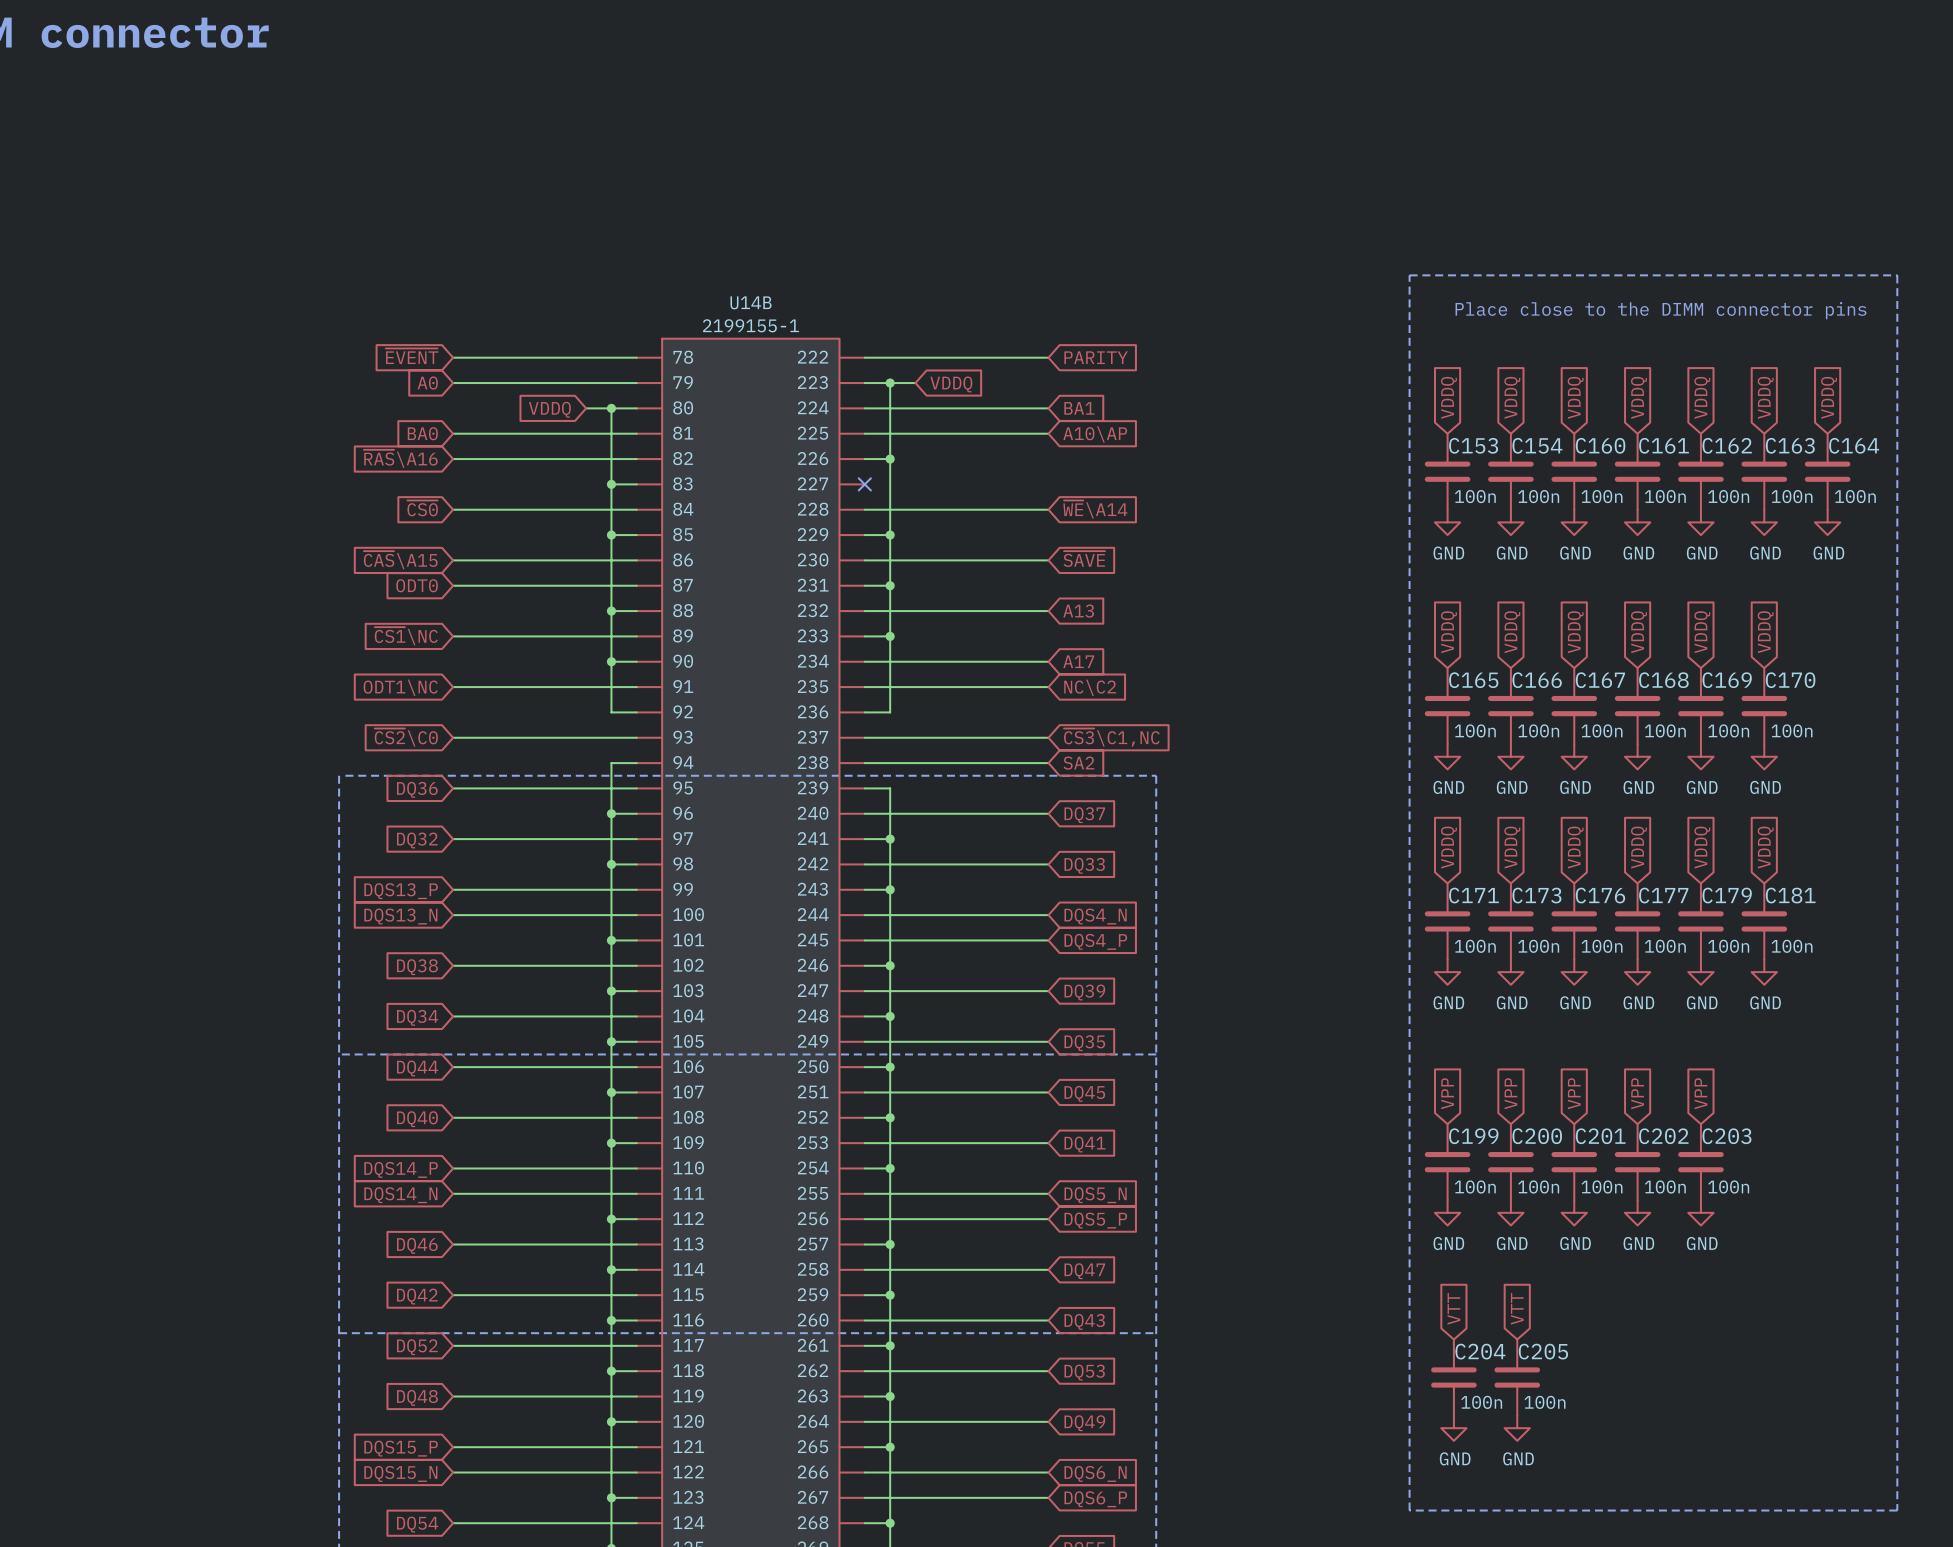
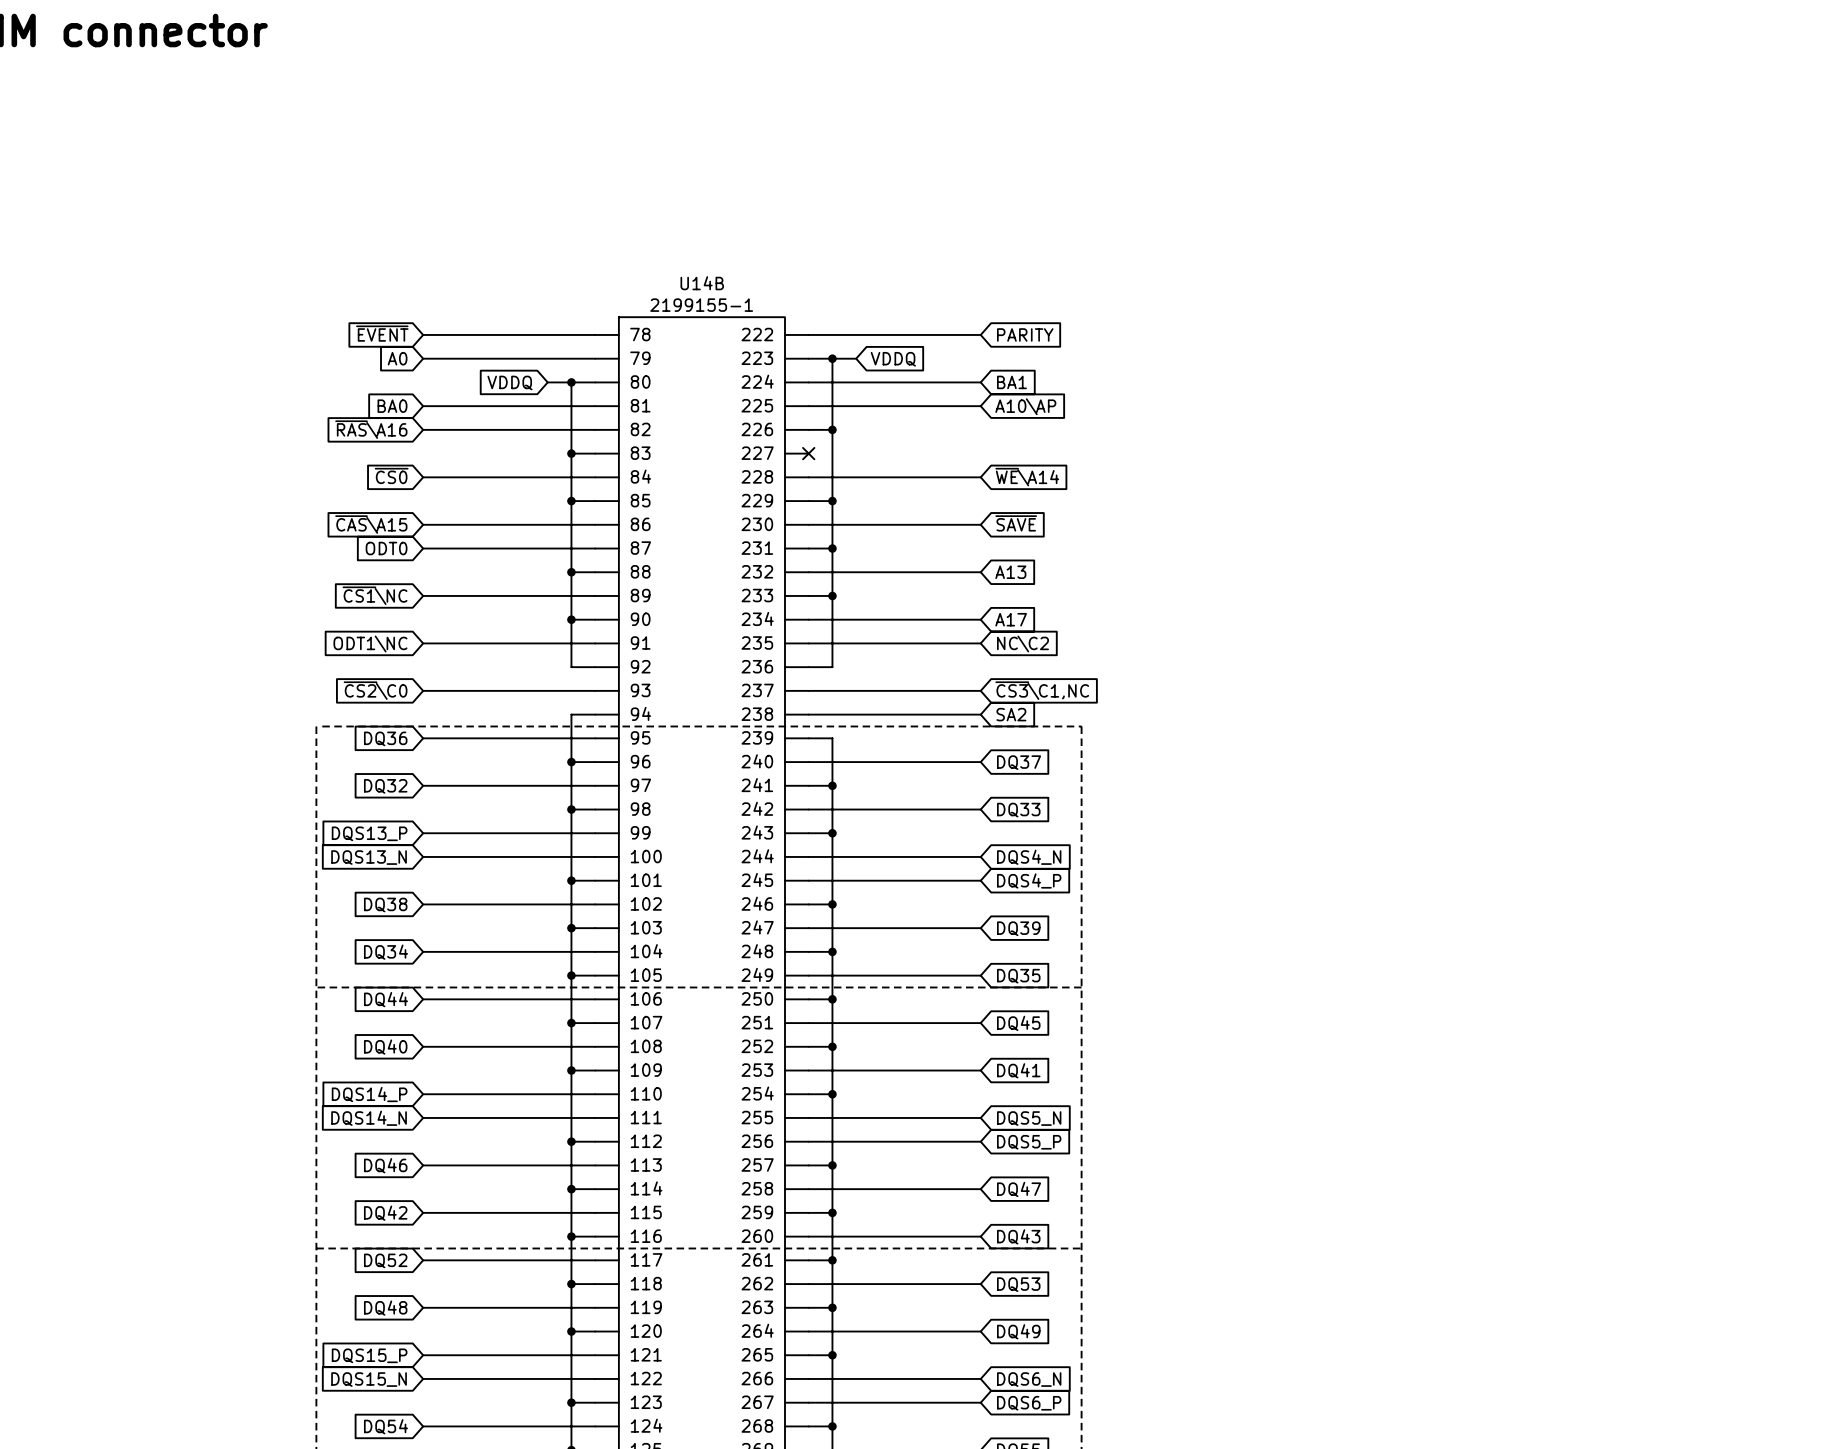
line: (1409, 275) (1897, 275) (1897, 1510) (1409, 1510) (1409, 275) -> none
text: Place close to the DIMM connector pins (1660, 310) -> none
global label: VDDQ (1448, 397) -> none
global label: VDDQ (1512, 397) -> none
global label: VDDQ (1575, 397) -> none
global label: VDDQ (1638, 397) -> none
global label: VDDQ (1702, 397) -> none
global label: VDDQ (1765, 397) -> none
global label: VDDQ (1829, 397) -> none
C153: (1447, 471) -> none
C154: (1510, 471) -> none
C160: (1574, 471) -> none
C161: (1637, 471) -> none
C162: (1700, 471) -> none
C163: (1764, 471) -> none
C164: (1827, 471) -> none
power symbol: GND (1447, 522) -> none
power symbol: GND (1510, 522) -> none
power symbol: GND (1574, 522) -> none
power symbol: GND (1637, 522) -> none
power symbol: GND (1700, 522) -> none
power symbol: GND (1764, 522) -> none
power symbol: GND (1827, 522) -> none
global label: VDDQ (1448, 632) -> none
global label: VDDQ (1512, 632) -> none
global label: VDDQ (1575, 632) -> none
global label: VDDQ (1638, 632) -> none
global label: VDDQ (1702, 632) -> none
global label: VDDQ (1765, 632) -> none
C165: (1447, 706) -> none
C166: (1510, 706) -> none
C167: (1574, 706) -> none
C168: (1637, 706) -> none
C169: (1700, 706) -> none
C170: (1764, 706) -> none
power symbol: GND (1447, 756) -> none
power symbol: GND (1510, 756) -> none
power symbol: GND (1574, 756) -> none
power symbol: GND (1637, 756) -> none
power symbol: GND (1700, 756) -> none
power symbol: GND (1764, 756) -> none
global label: VDDQ (1448, 847) -> none
global label: VDDQ (1512, 847) -> none
global label: VDDQ (1575, 847) -> none
global label: VDDQ (1638, 847) -> none
global label: VDDQ (1702, 847) -> none
global label: VDDQ (1765, 847) -> none
C171: (1447, 921) -> none
C173: (1510, 921) -> none
C176: (1574, 921) -> none
C177: (1637, 921) -> none
C179: (1700, 921) -> none
C181: (1764, 921) -> none
power symbol: GND (1447, 972) -> none
power symbol: GND (1510, 972) -> none
power symbol: GND (1574, 972) -> none
power symbol: GND (1637, 972) -> none
power symbol: GND (1700, 972) -> none
power symbol: GND (1764, 972) -> none
global label: VPP (1447, 1093) -> none
global label: VPP (1510, 1093) -> none
global label: VPP (1574, 1093) -> none
global label: VPP (1637, 1093) -> none
global label: VPP (1700, 1093) -> none
C199: (1447, 1162) -> none
C200: (1510, 1162) -> none
C201: (1574, 1162) -> none
C202: (1637, 1162) -> none
C203: (1700, 1162) -> none
power symbol: GND (1447, 1212) -> none
power symbol: GND (1510, 1212) -> none
power symbol: GND (1574, 1212) -> none
power symbol: GND (1637, 1212) -> none
power symbol: GND (1700, 1212) -> none
global label: VTT (1453, 1308) -> none
global label: VTT (1517, 1308) -> none
C204: (1453, 1377) -> none
C205: (1517, 1377) -> none
power symbol: GND (1453, 1428) -> none
power symbol: GND (1517, 1428) -> none

